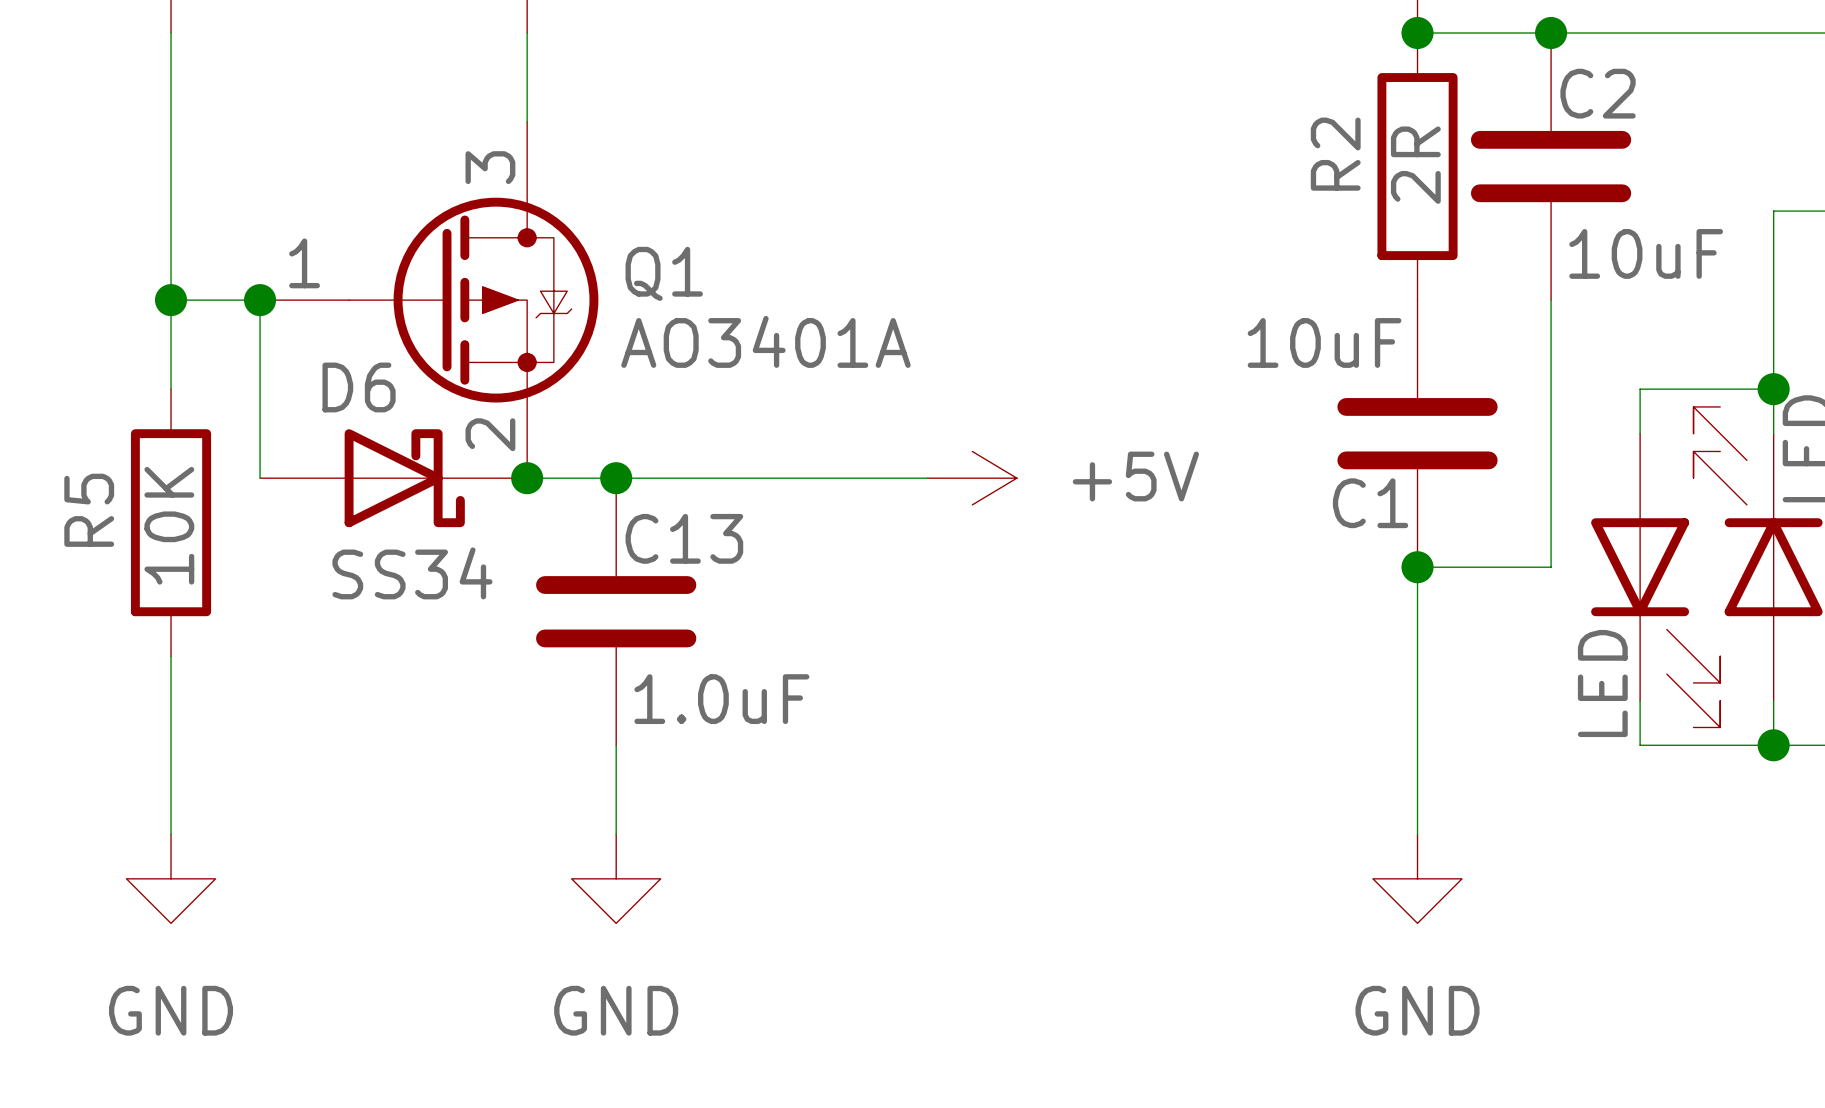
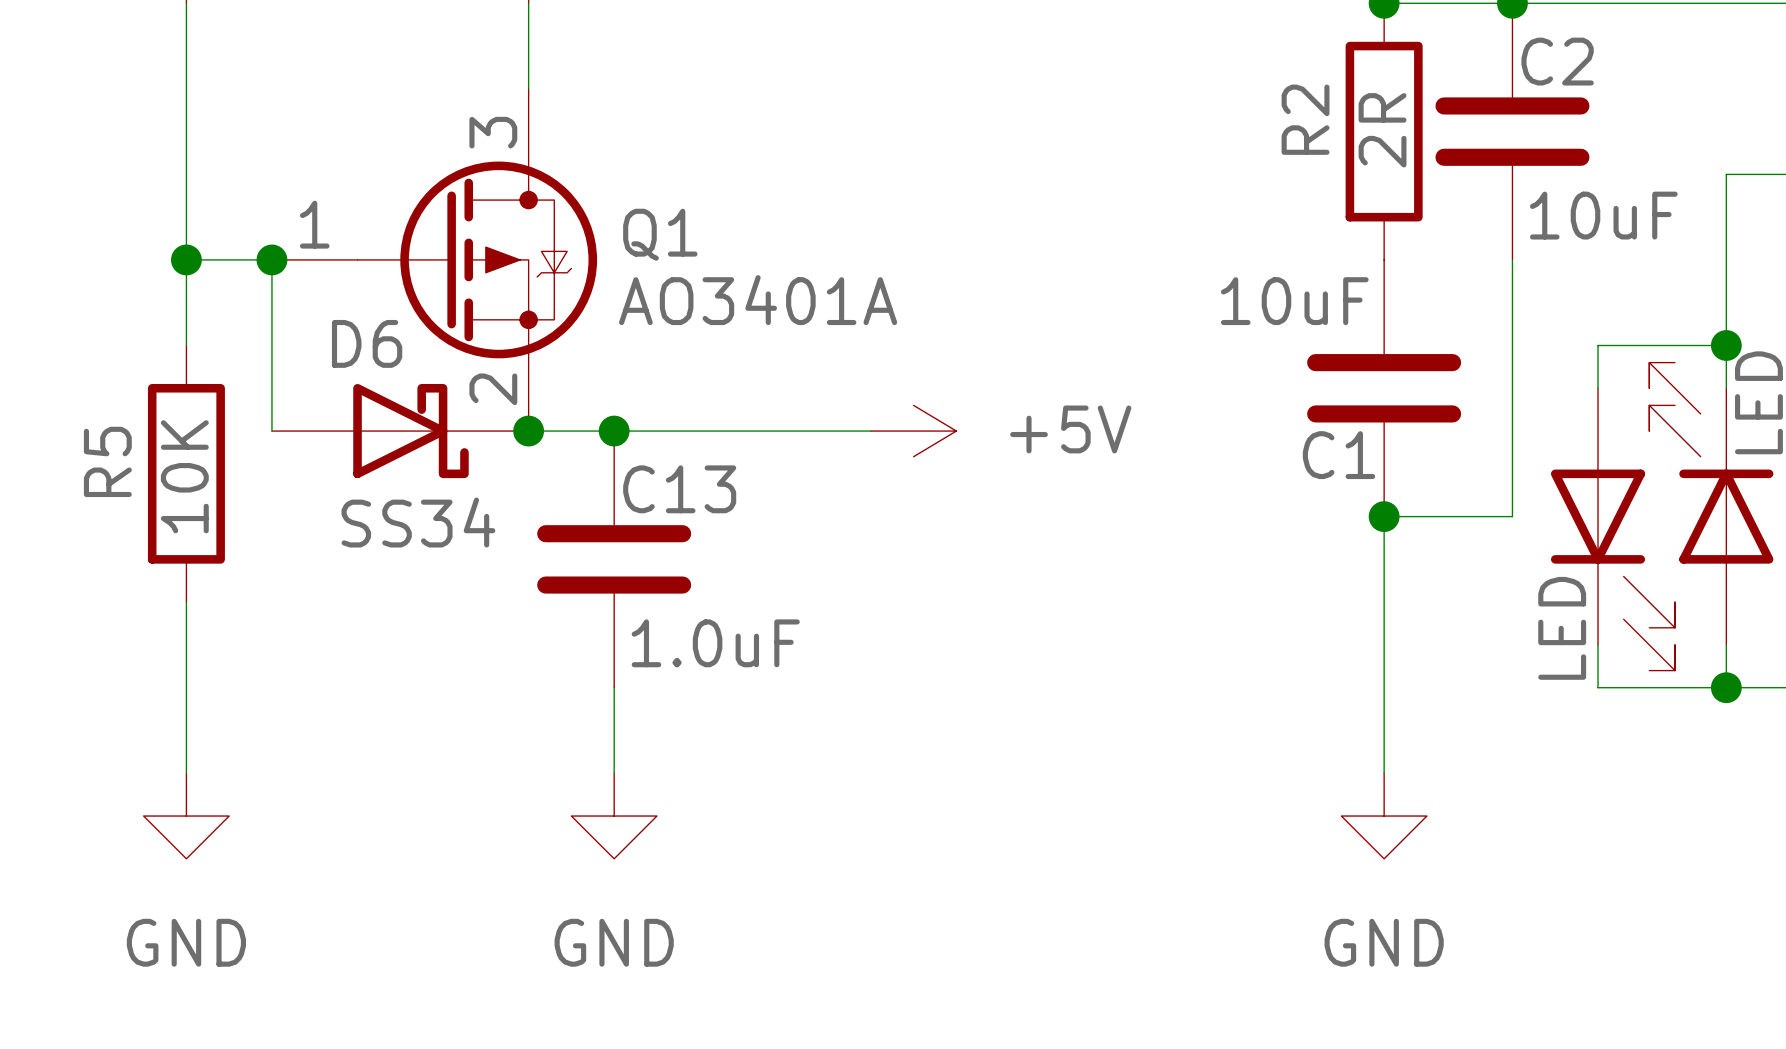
power symbol position: +5V (972, 478) -> +5V (913, 431)

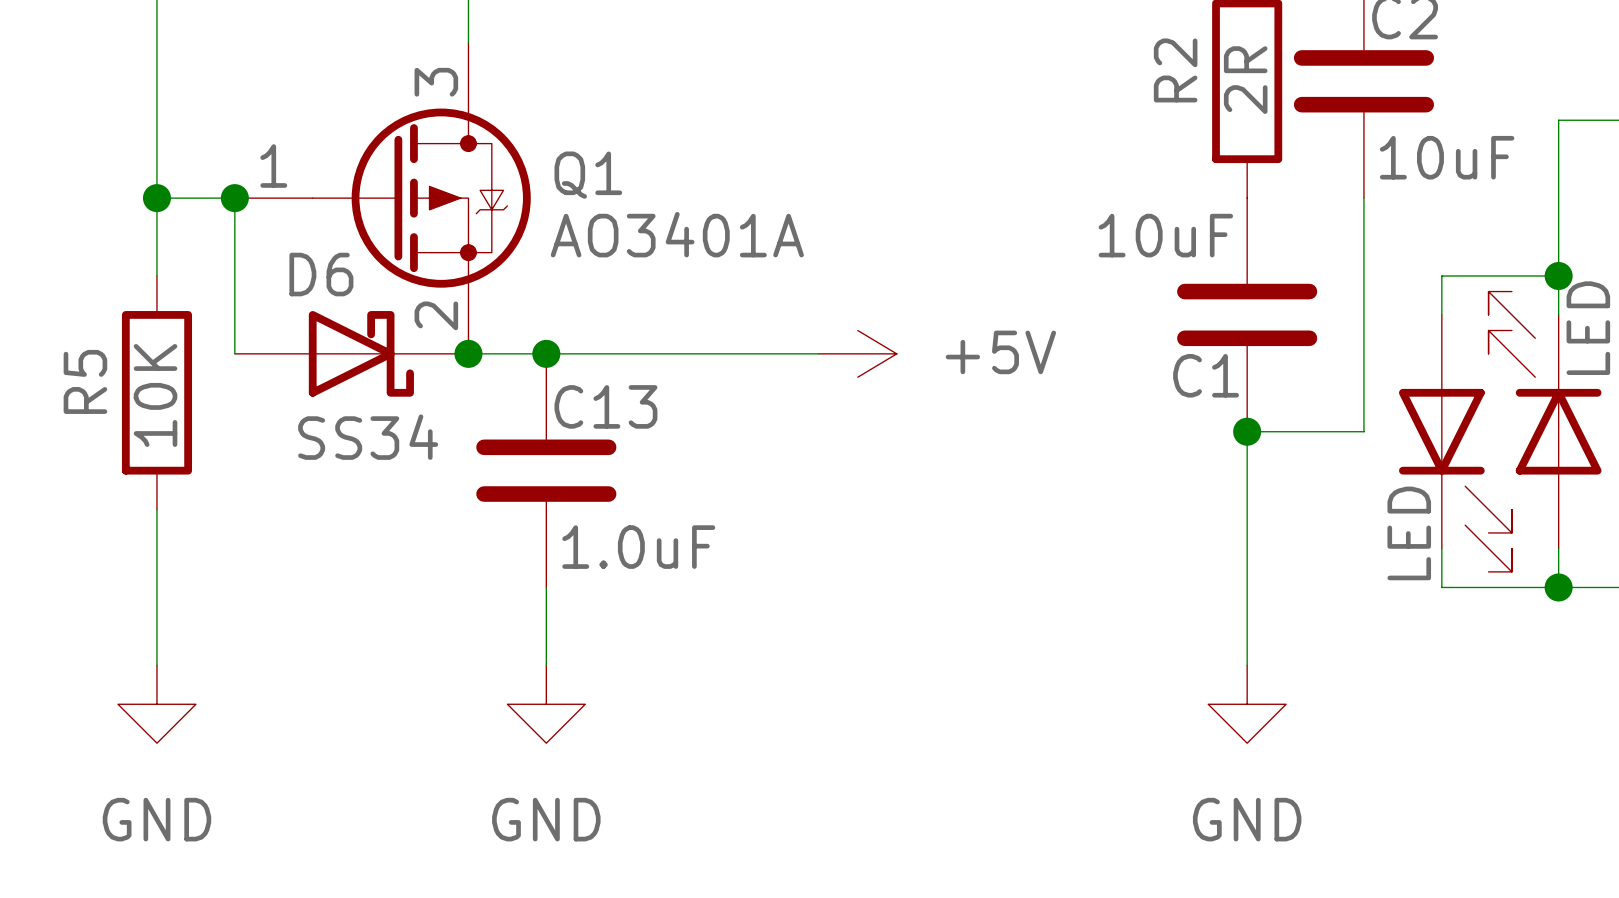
power symbol position: +5V (913, 431) -> +5V (857, 353)

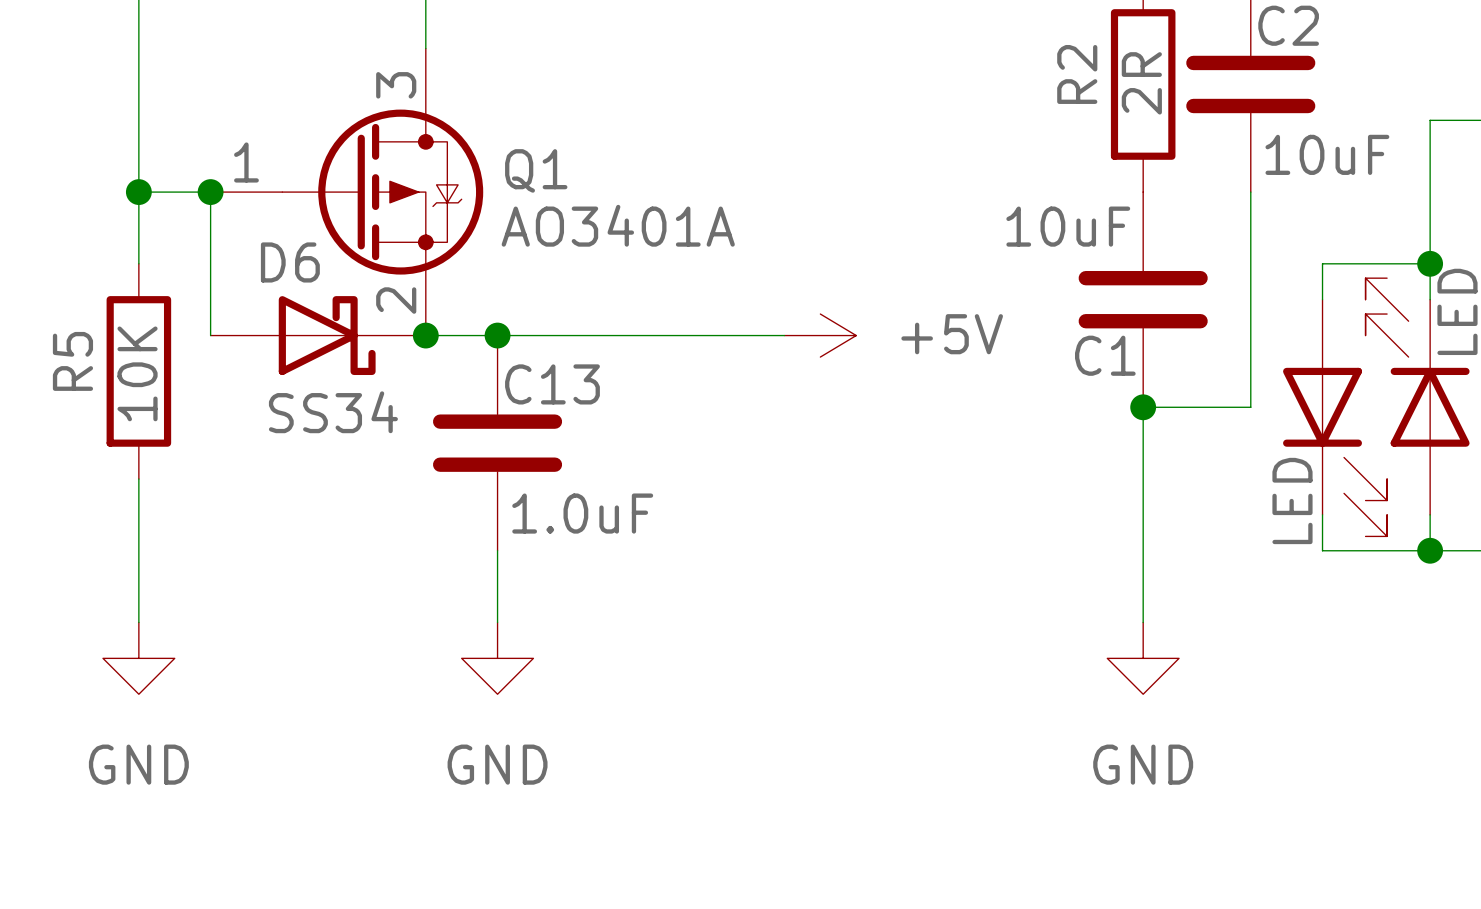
power symbol position: +5V (857, 353) -> +5V (820, 335)

